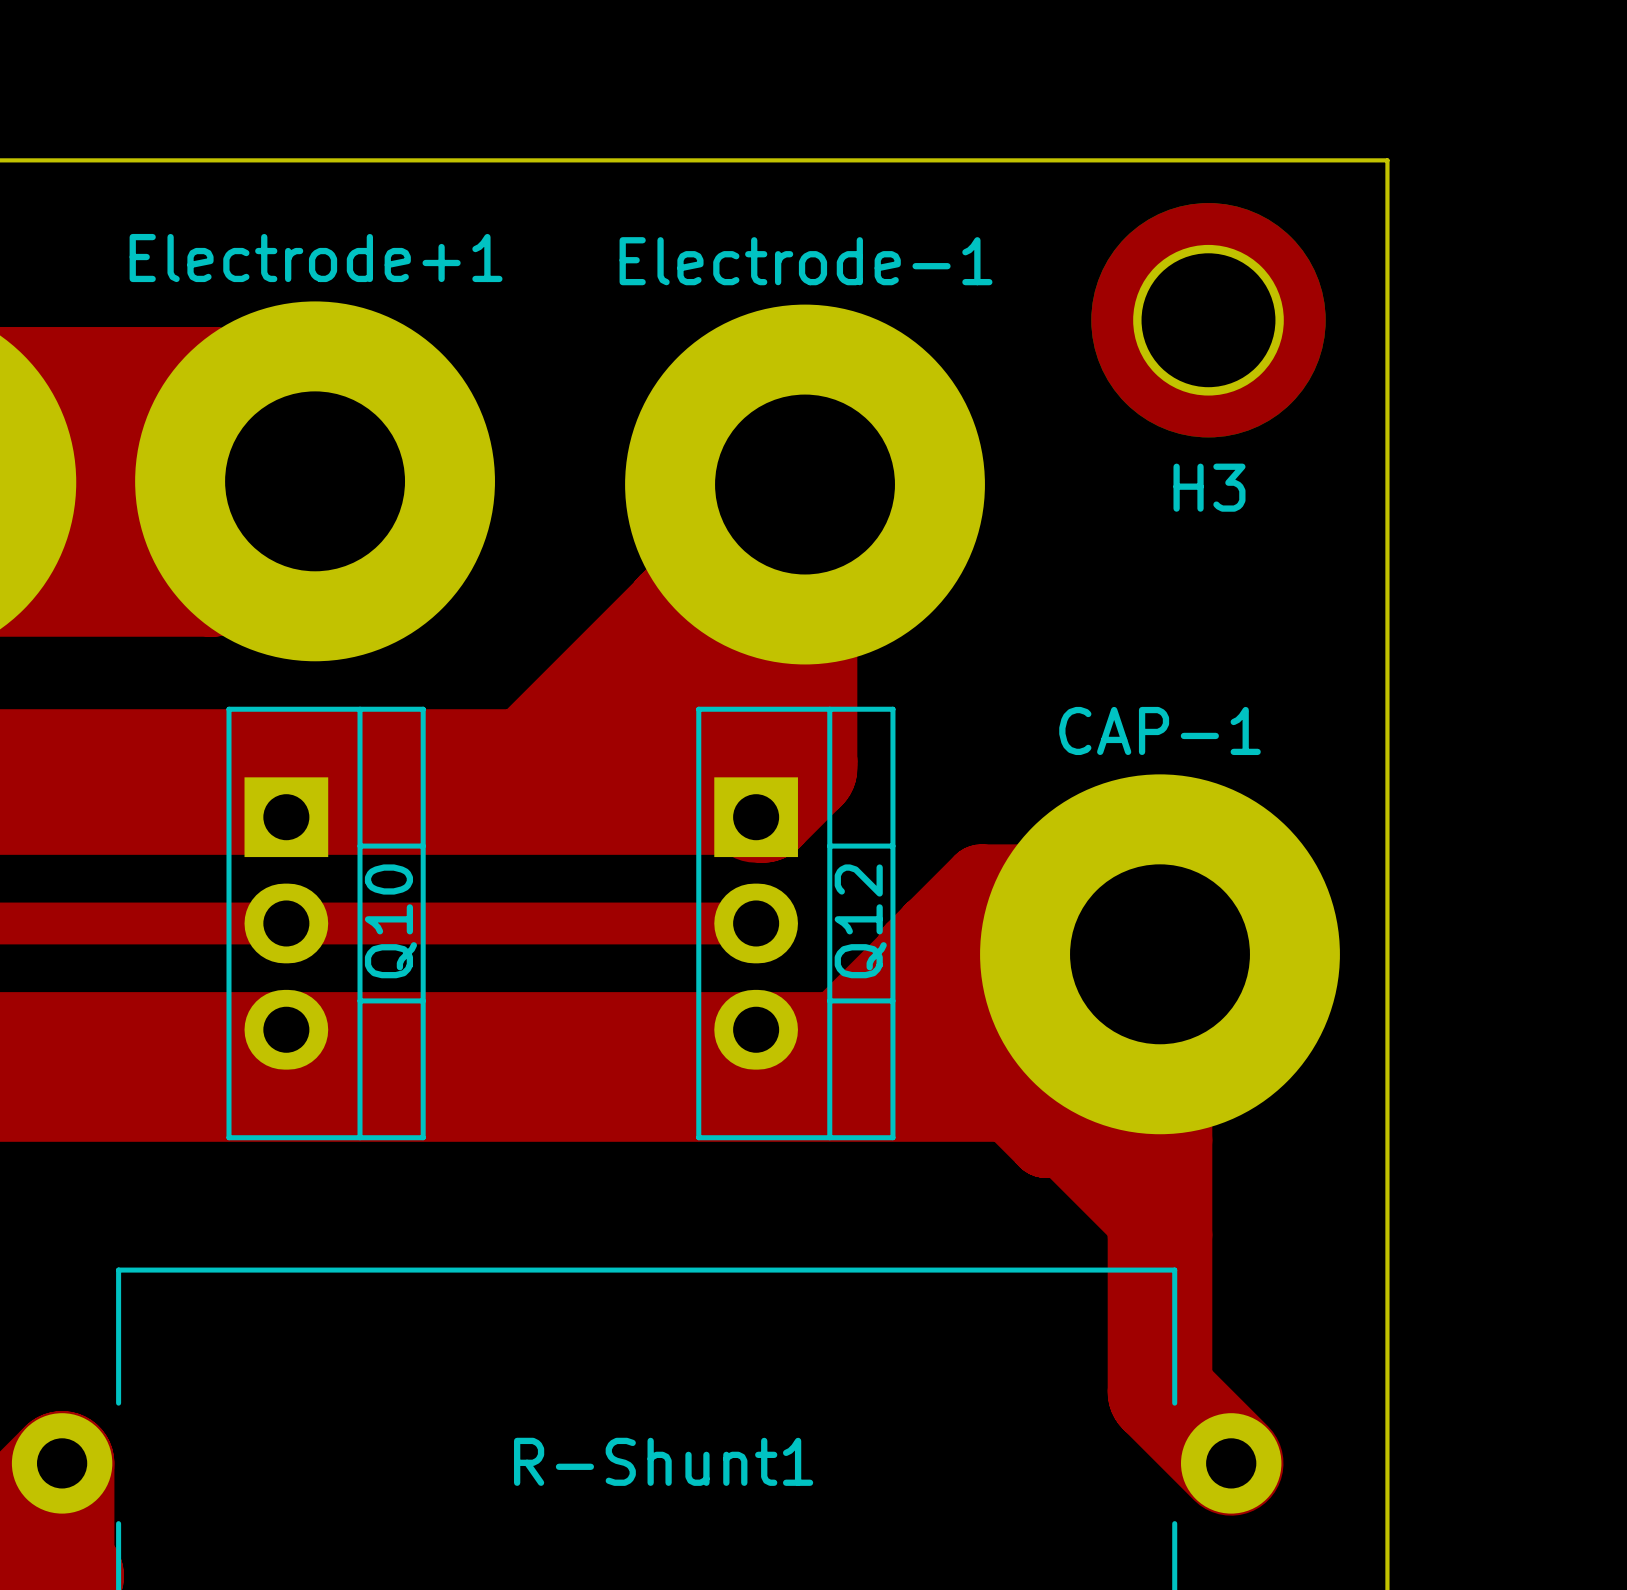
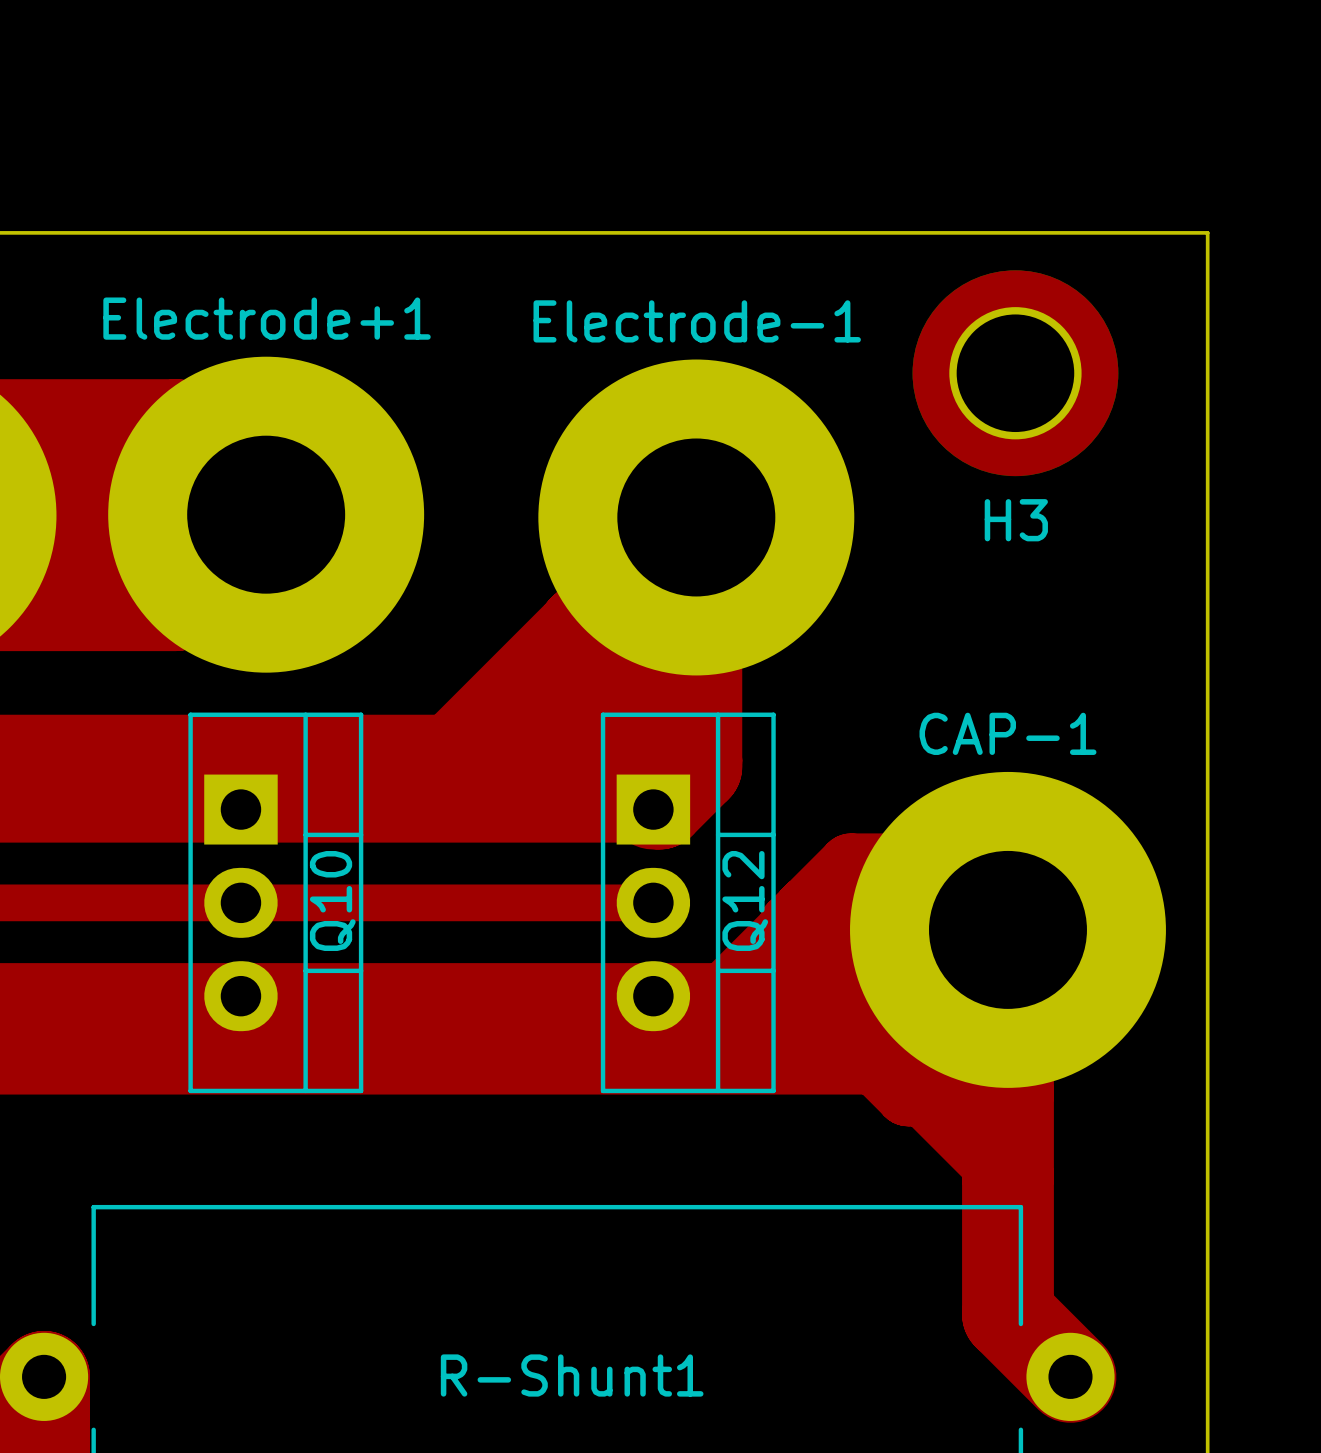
H3 position: (1208, 320) -> (1015, 373)

